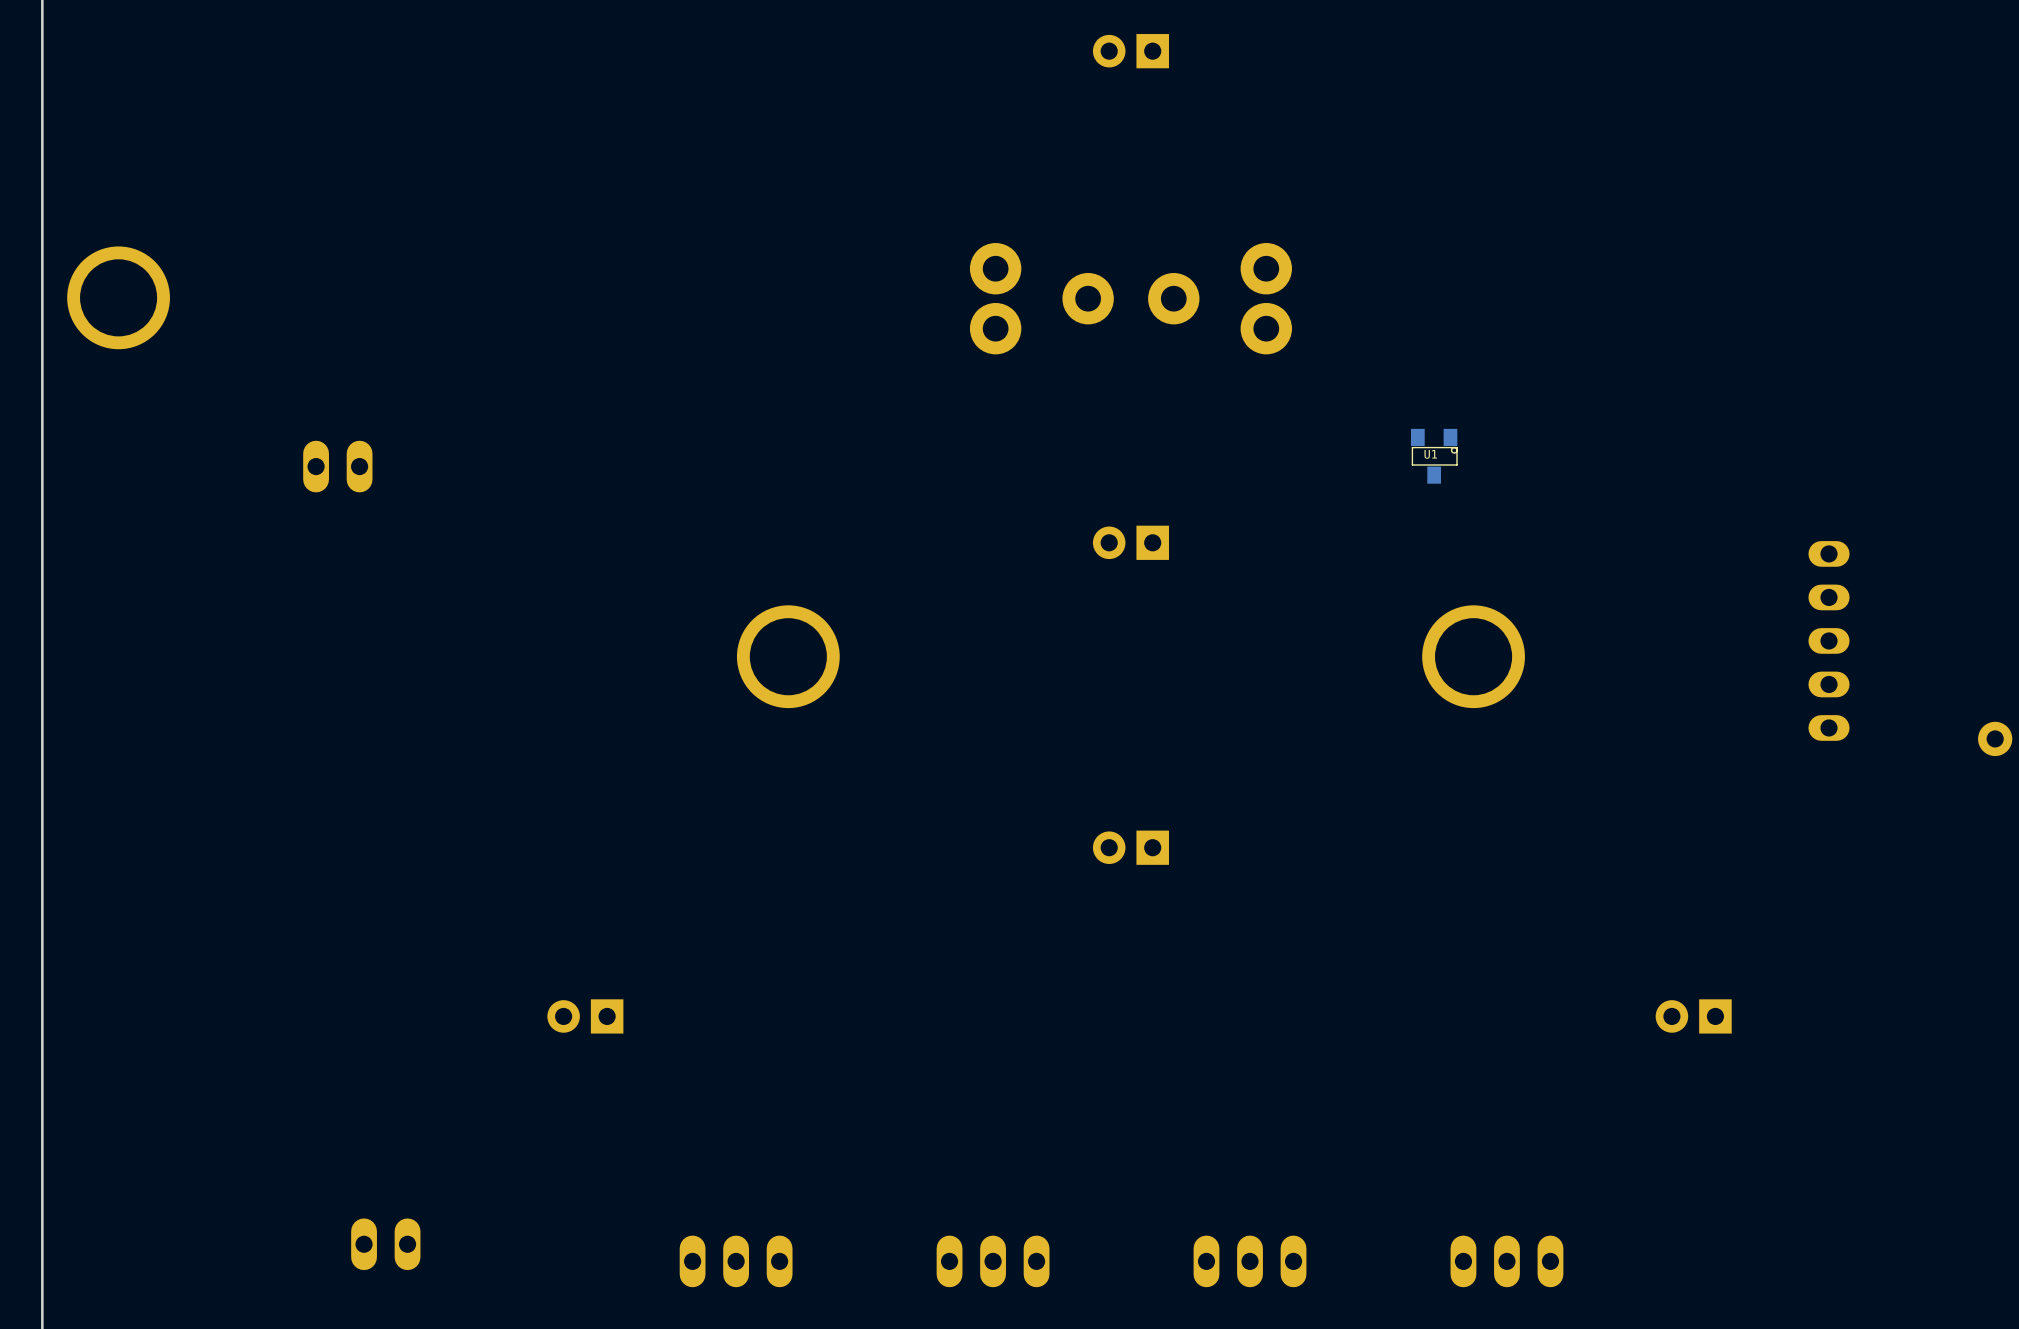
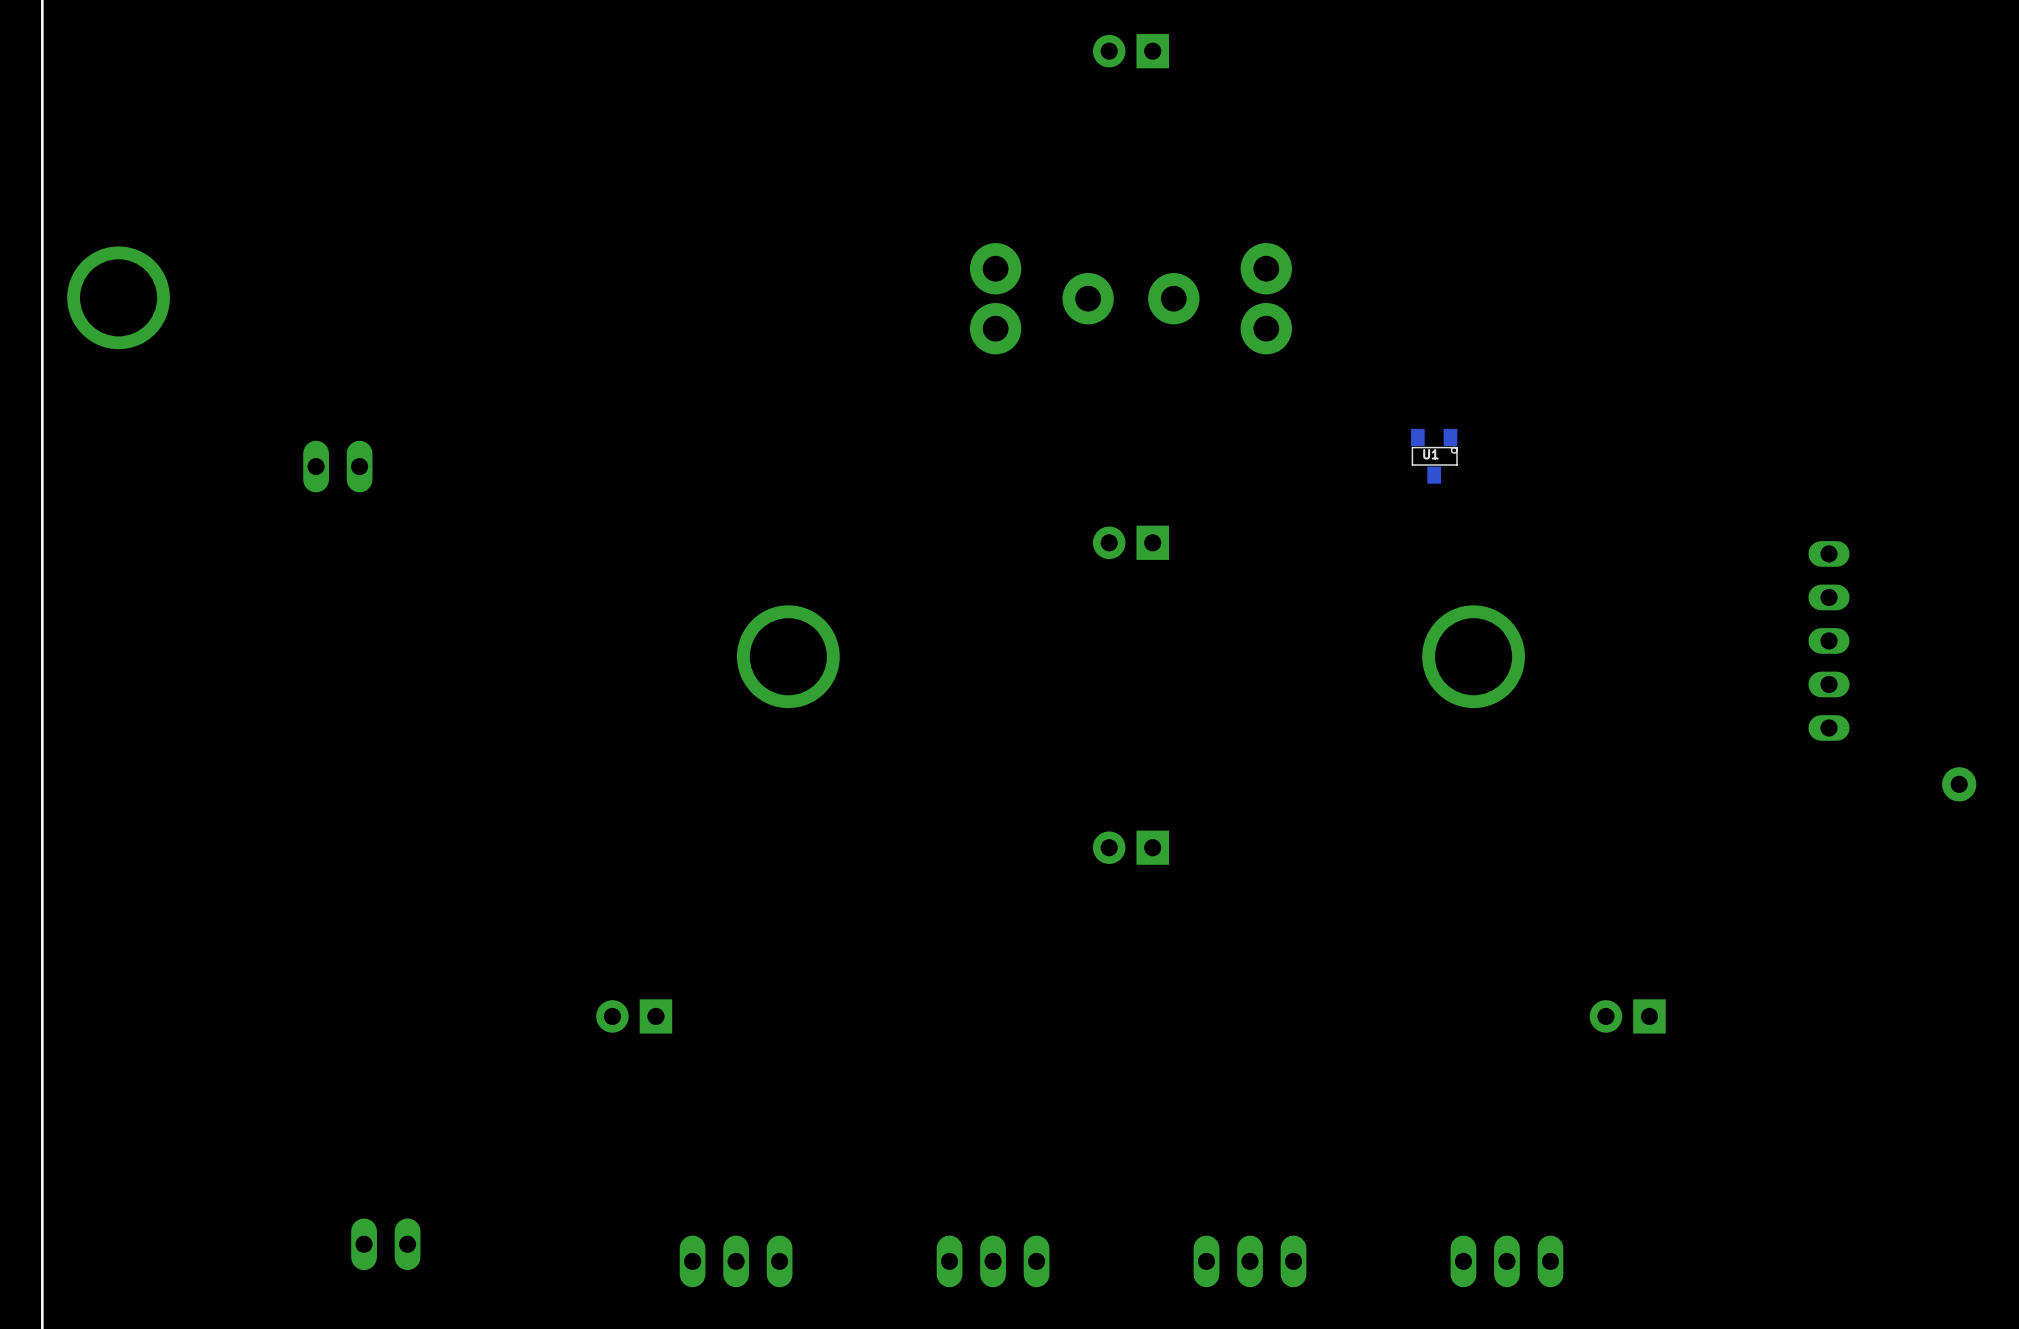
part position: (1995, 738) -> (1959, 784)
part position: (585, 1016) -> (634, 1016)
part position: (1693, 1016) -> (1627, 1016)

